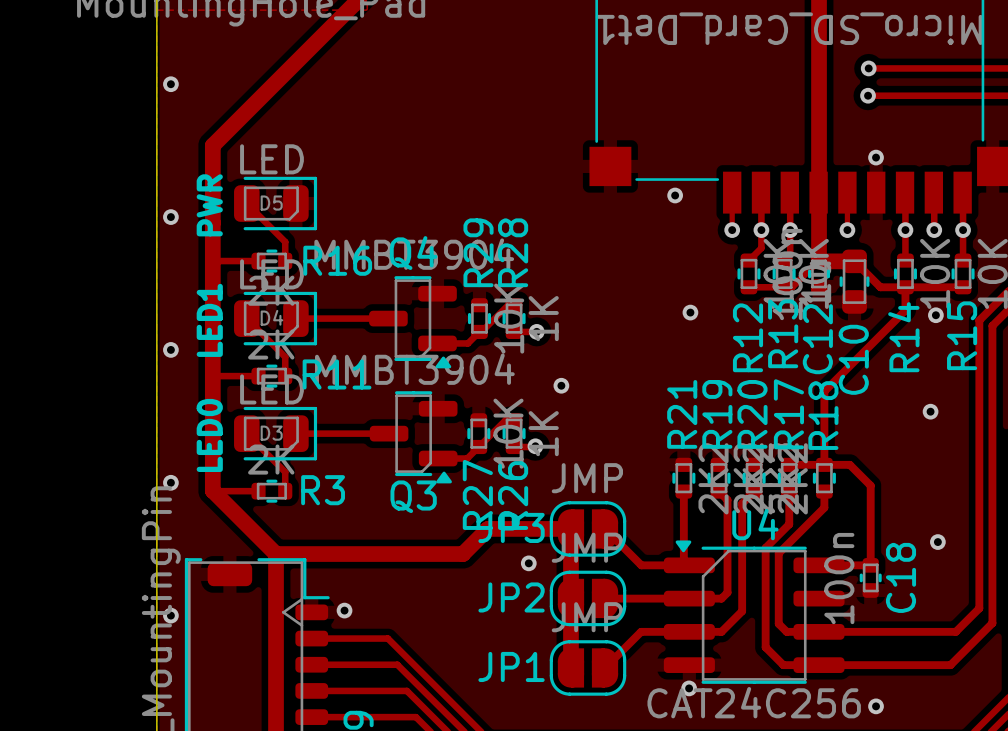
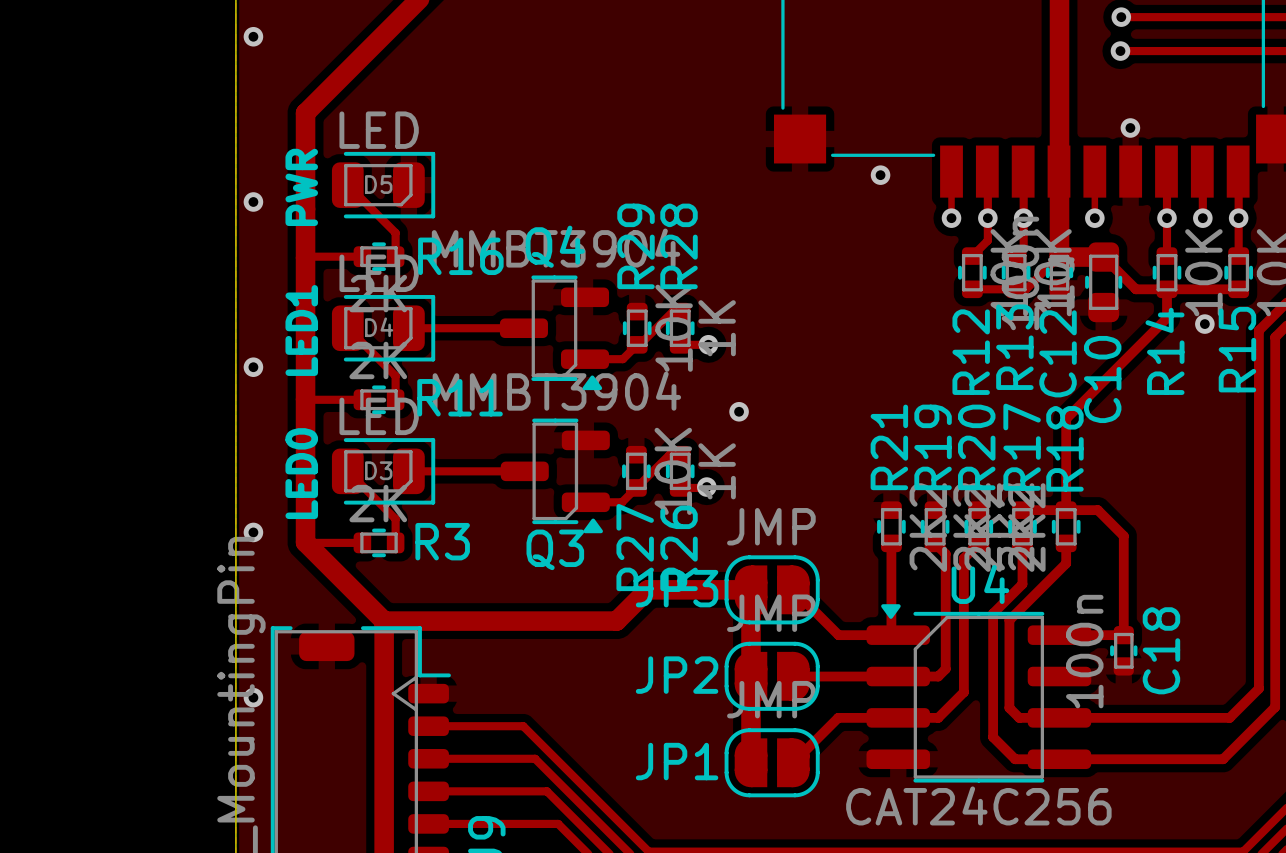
via: (690, 312) -> none
via: (930, 411) -> none
via: (937, 542) -> none
via: (528, 563) -> none
via: (344, 610) -> none
via: (689, 688) -> none
via: (876, 706) -> none

